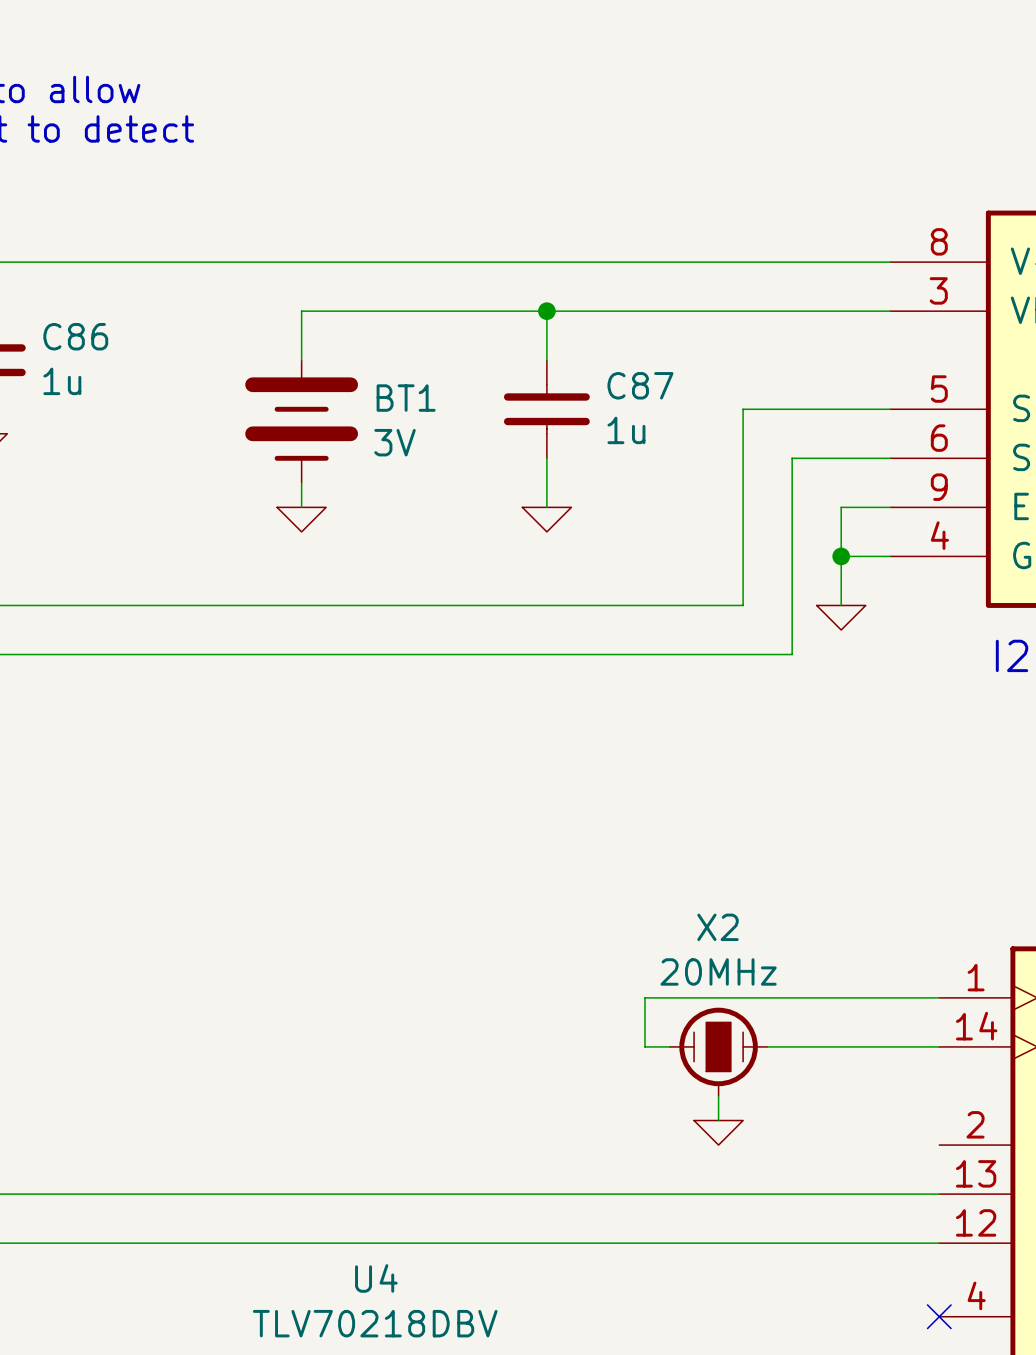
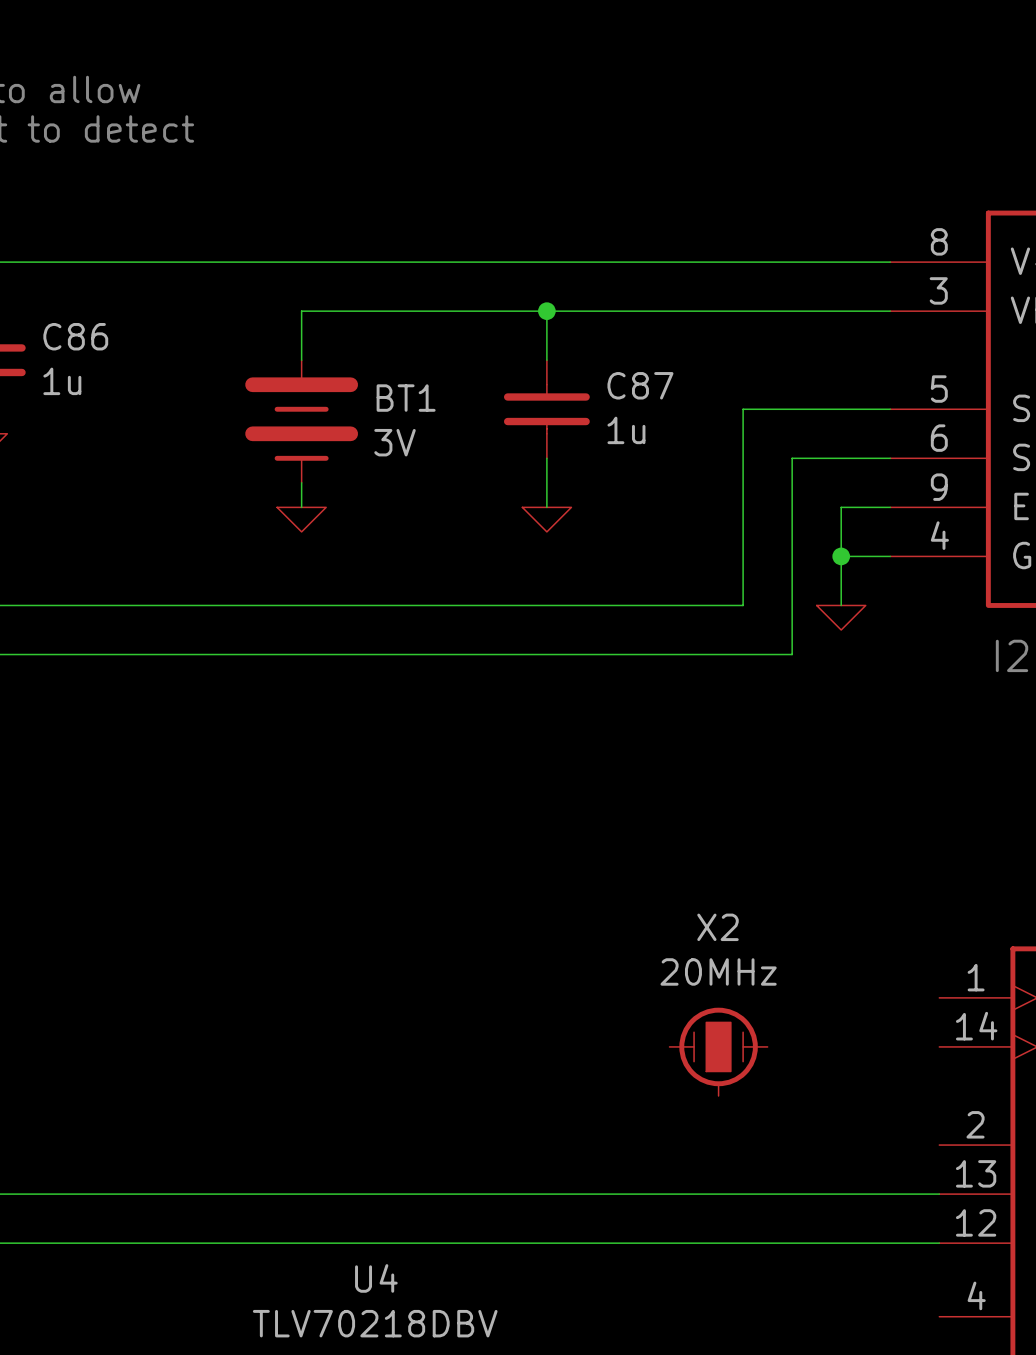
wire: (939, 997) (645, 997) (645, 1046) (669, 1046) -> none
wire: (767, 1046) (939, 1046) -> none
wire: (718, 1096) (718, 1120) -> none
power symbol: (718, 1132) -> none
no-connect mark: (939, 1316) -> none

